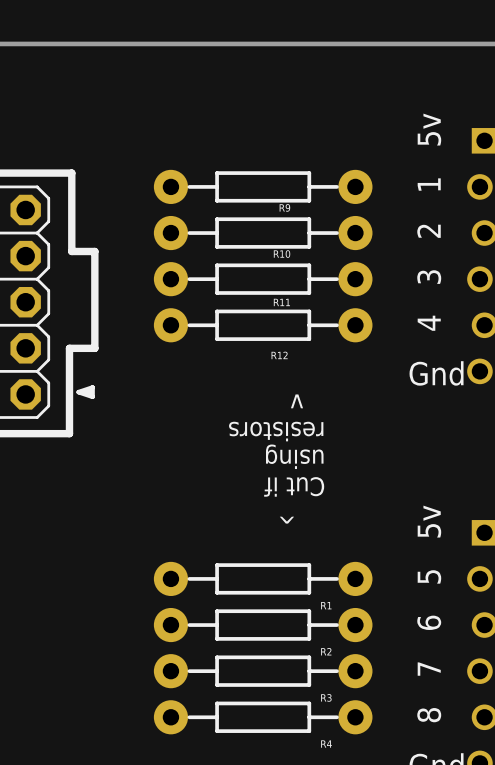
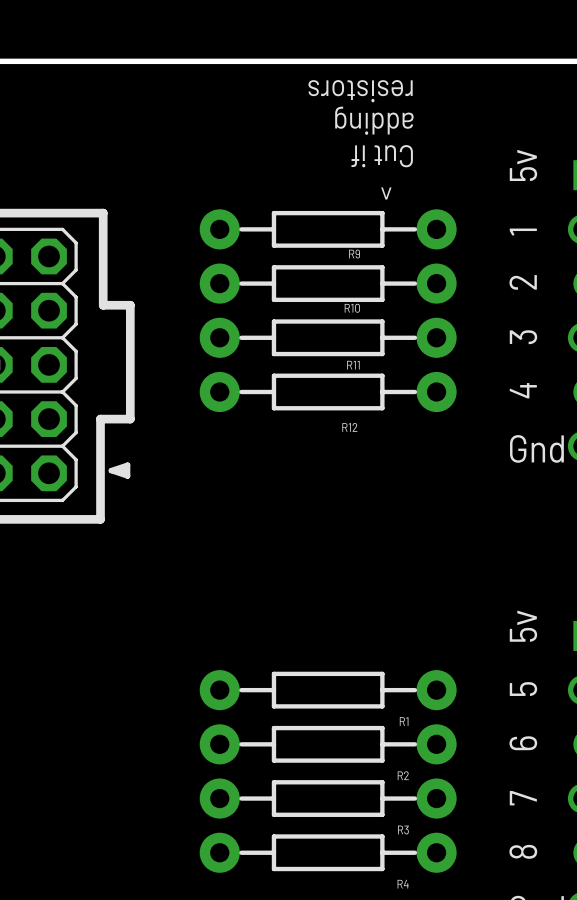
text: none -> adding (374, 120)
text: v (296, 401) -> none
text position: resistors (276, 431) -> resistors (360, 91)
text: using (294, 456) -> none
text position: Cut if (294, 486) -> Cut if (382, 156)
text position: ^ (286, 520) -> ^ (386, 193)

